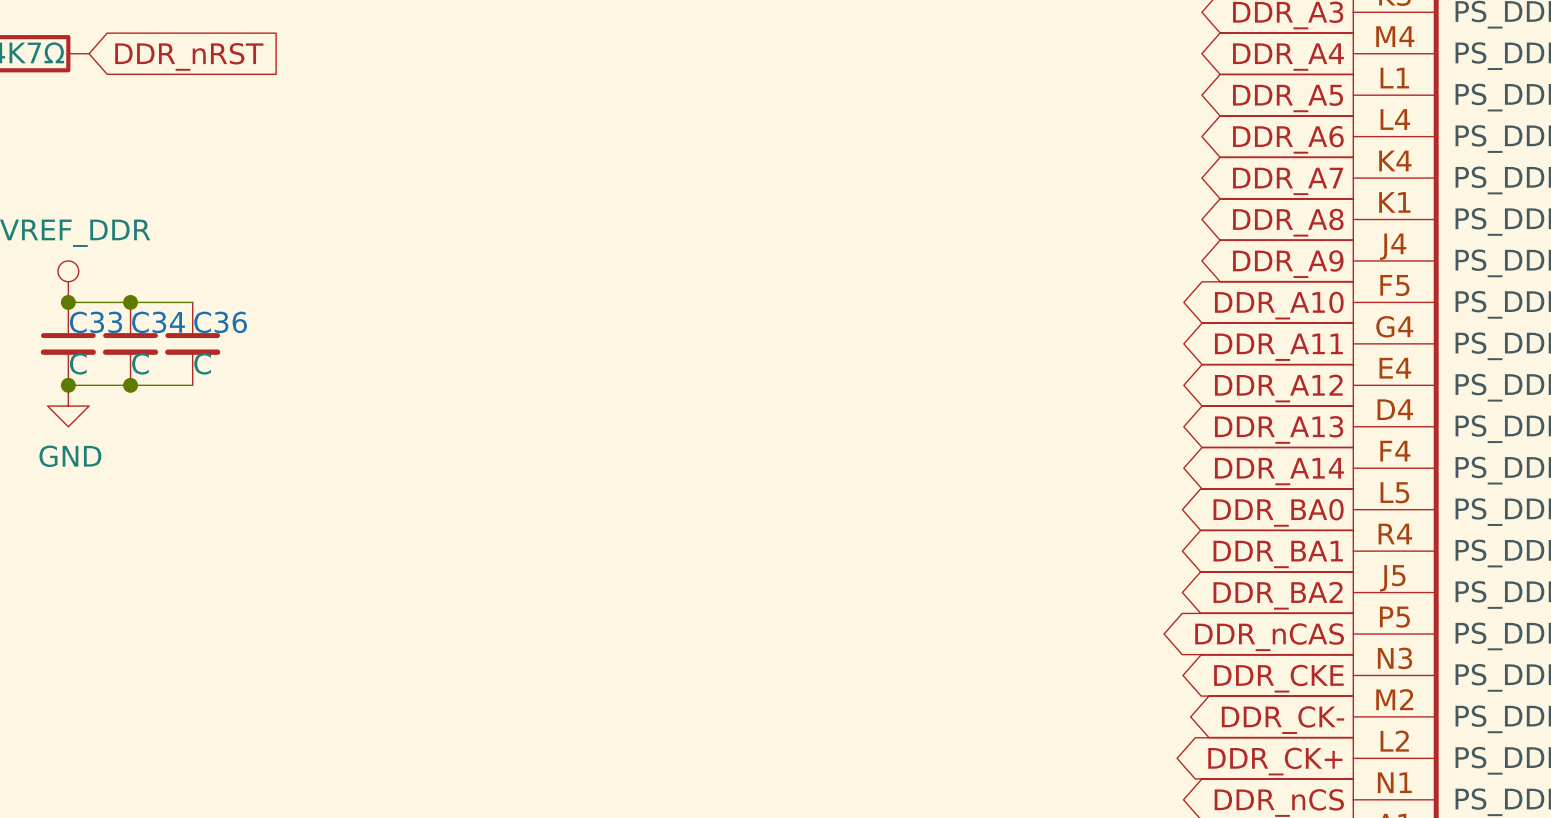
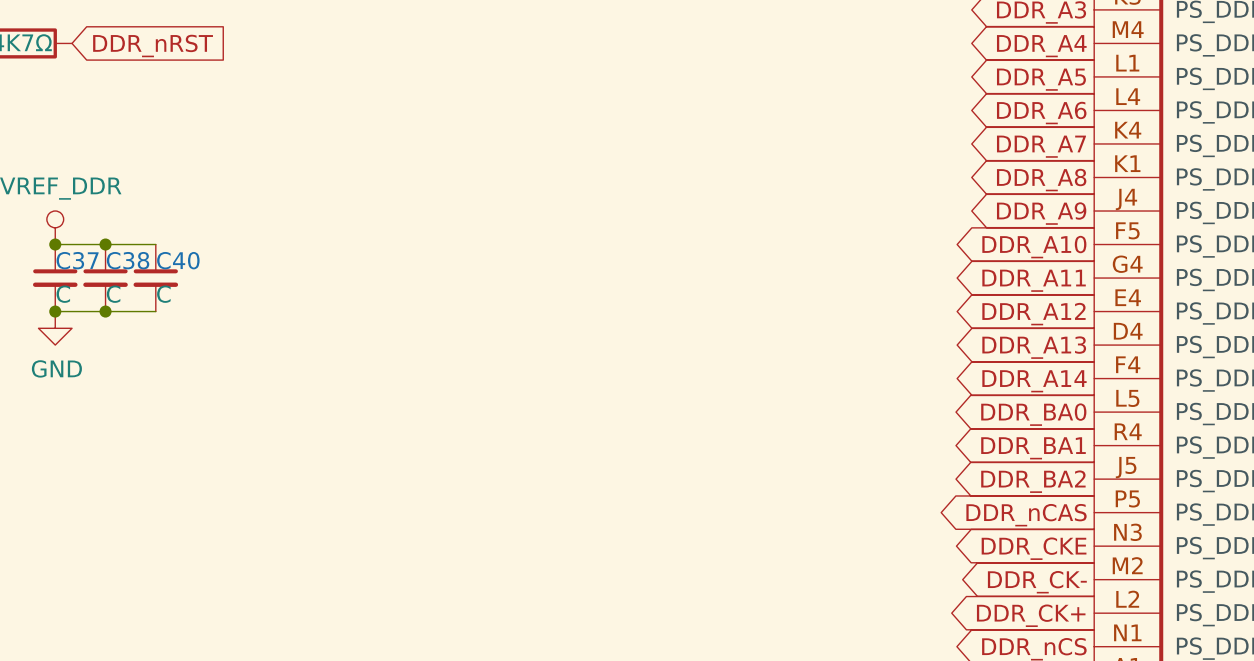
C33 name: C33 (96, 322) -> C37 (77, 260)
C34 name: C34 (158, 322) -> C38 (128, 260)
C36 name: C36 (220, 322) -> C40 (178, 260)

